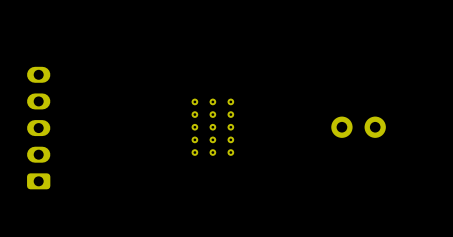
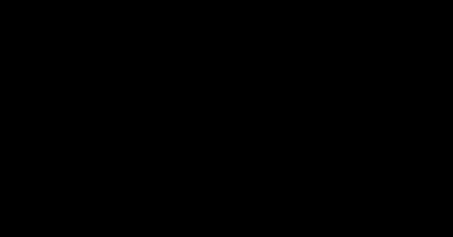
part: (212, 127) -> none
part: (358, 127) -> none
part: (38, 128) -> none

